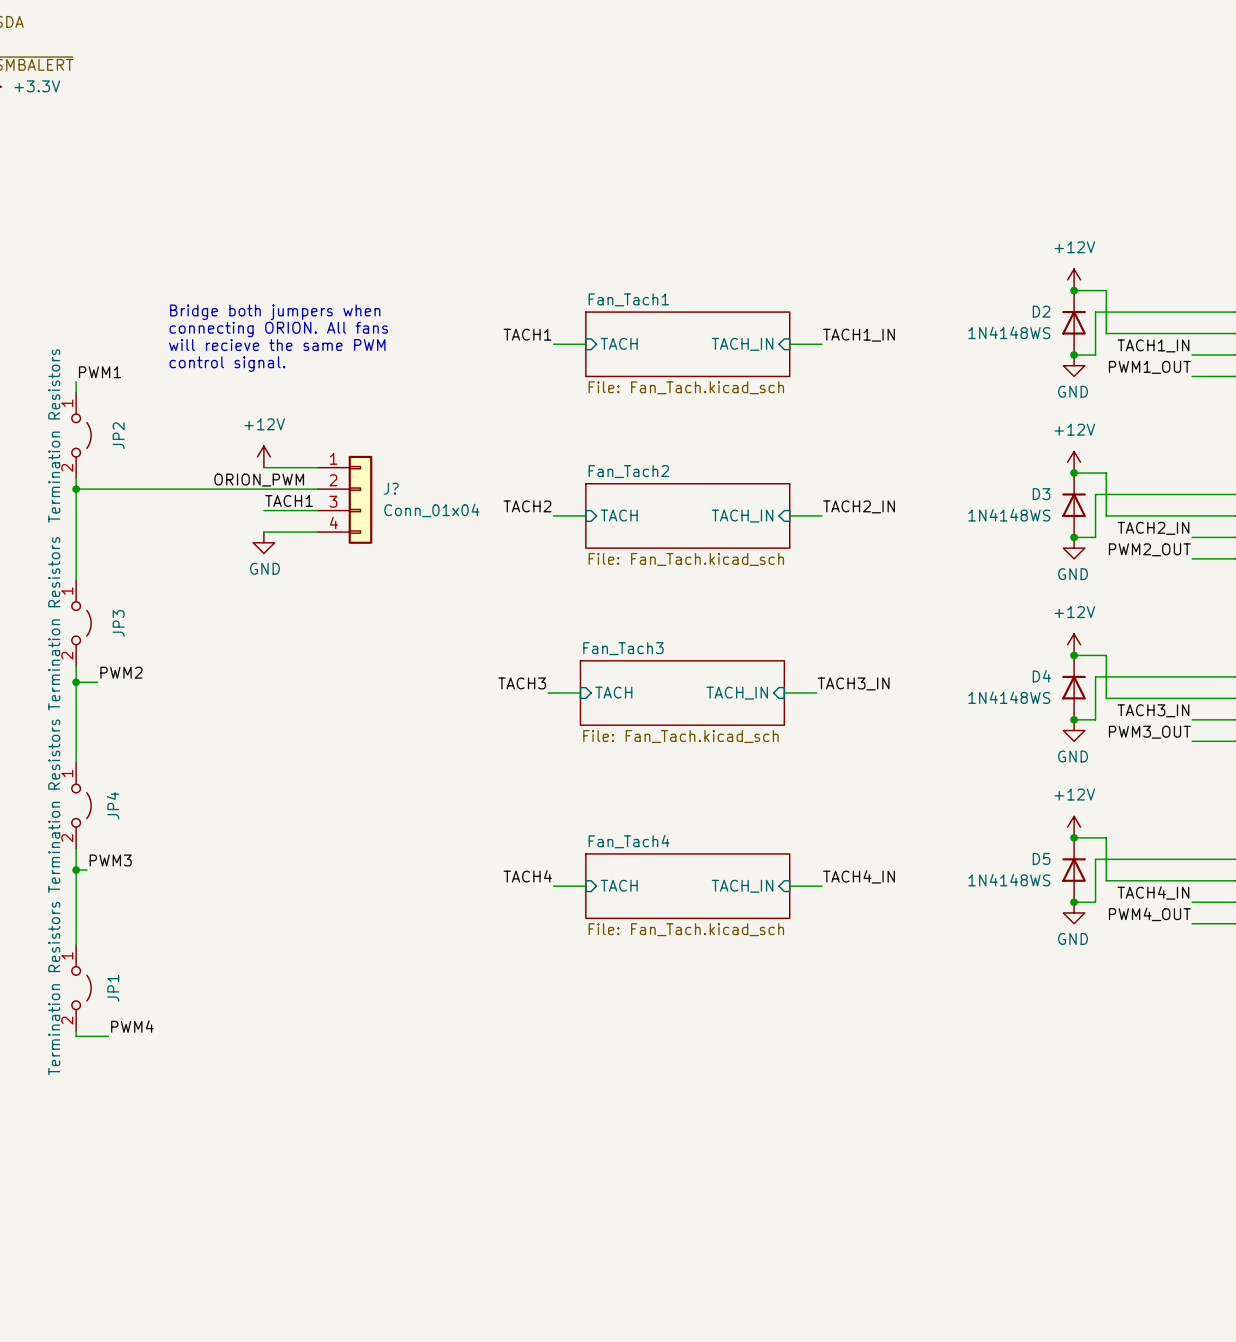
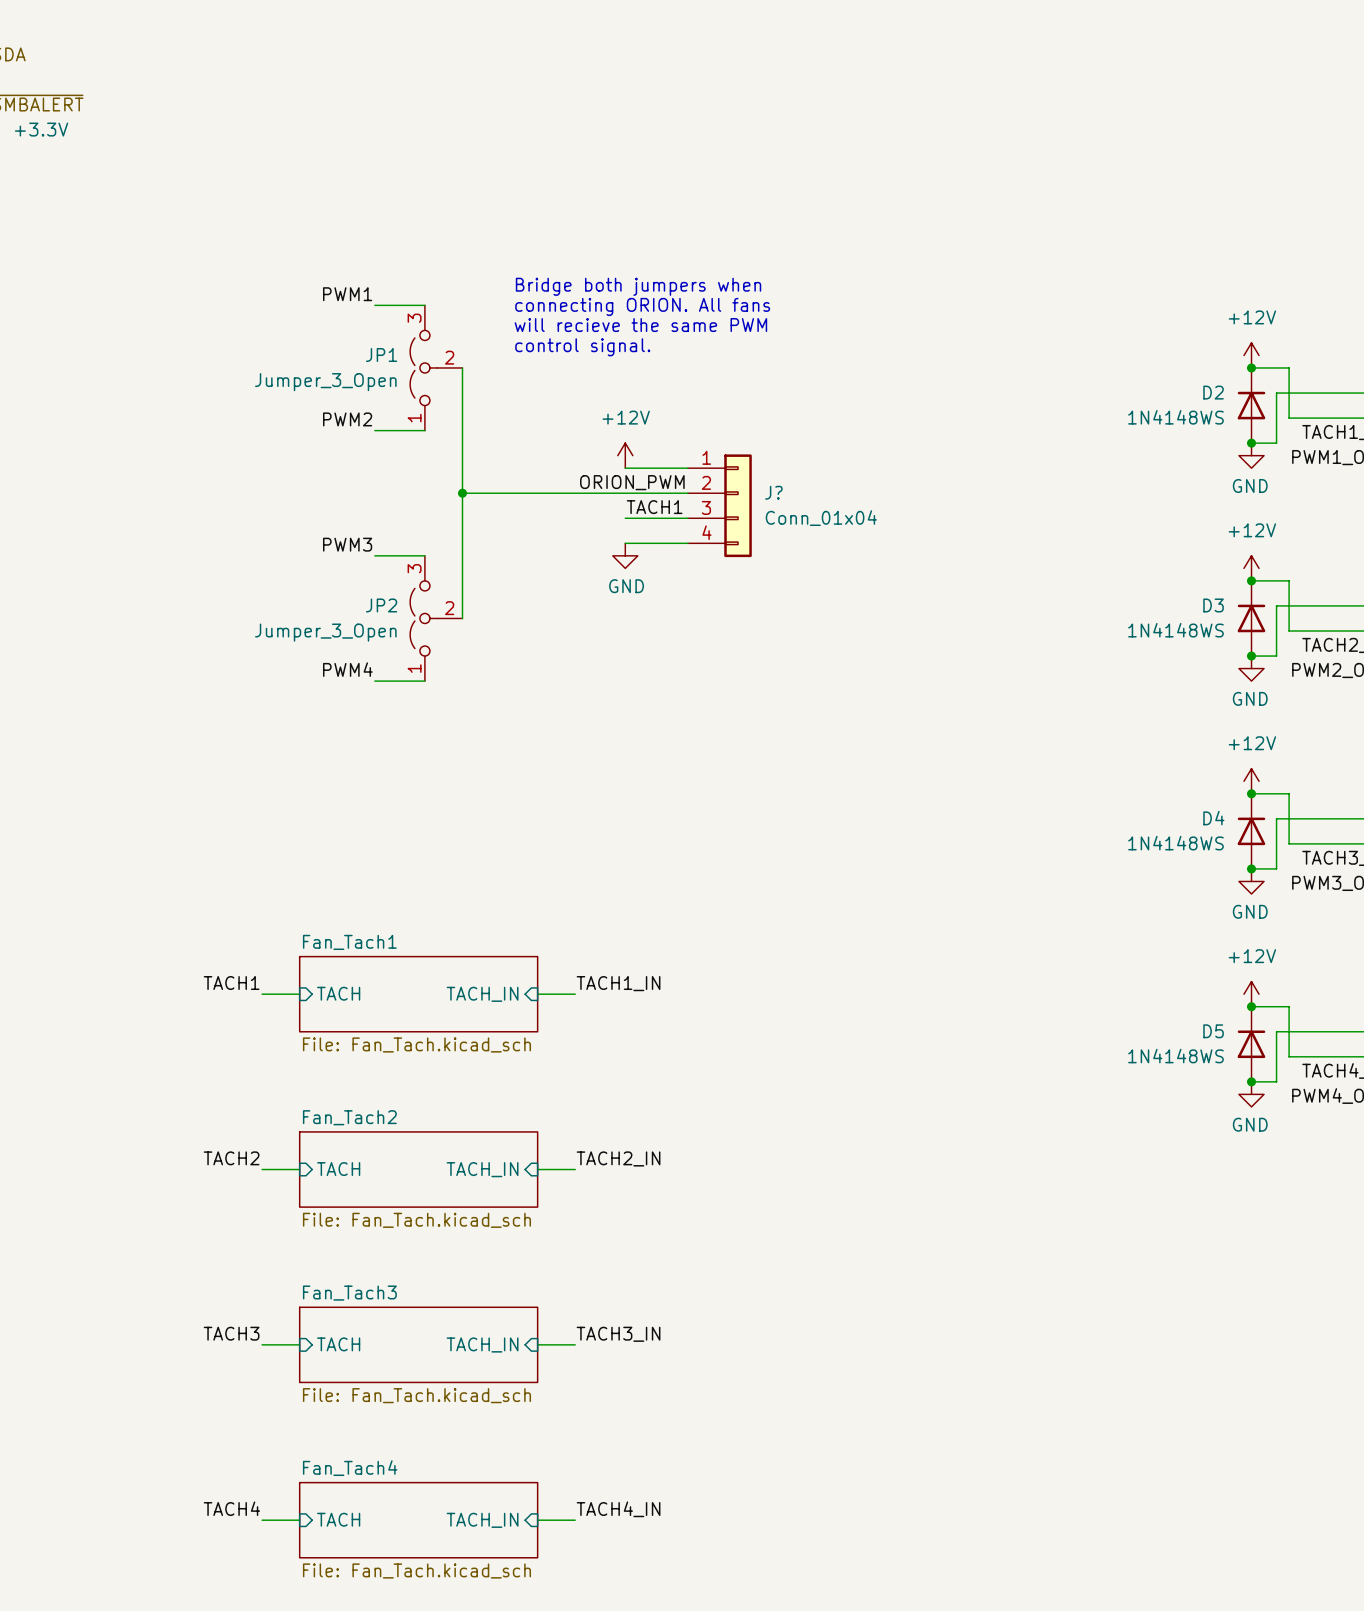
text: none -> Bridge both jumpers when (638, 286)
label: none -> PWM1 (347, 294)
wire: none -> (374, 305) (424, 305)
text: none -> connecting ORION. All fans (642, 306)
text: none -> will recieve the same PWM (640, 325)
text: none -> control signal. (582, 347)
wire: none -> (462, 367) (462, 618)
text: Bridge both jumpers when (275, 312) -> none
text: connecting ORION. All fans (278, 329) -> none
label: none -> PWM2 (347, 419)
label position: TACH1 (527, 334) -> TACH1 (654, 507)
label: TACH1_IN (859, 335) -> none
sheet pin: TACH (619, 343) -> none
wire: none -> (374, 430) (424, 430)
wire: (553, 344) (585, 344) -> none
sheet Fan_Tach1 position: (687, 344) -> (418, 994)
sheet pin: TACH_IN (742, 344) -> none
wire: (789, 344) (821, 344) -> none
text: will recieve the same PWM (277, 345) -> none
text: control signal. (227, 364) -> none
power symbol: none -> +12V (625, 455)
label: PWM1 (99, 372) -> none
wire: none -> (625, 468) (687, 468)
wire: (76, 381) (76, 392) -> none
label: none -> ORION_PWM (632, 482)
JP2 symbol: [71, 392, 92, 479] -> [410, 555, 463, 682]
wire: none -> (462, 493) (687, 493)
junction: none -> (462, 493)
J?: none -> Conn_01x04 (719, 505)
wire: none -> (625, 518) (687, 518)
JP2 value: Termination Resistors (54, 435) -> Jumper_3_Open (325, 632)
JP2 name position: JP2 (118, 435) -> JP2 (381, 605)
wire: none -> (625, 543) (687, 543)
label: none -> PWM3 (347, 544)
wire: none -> (374, 555) (424, 555)
power symbol: none -> GND (625, 555)
power symbol: +12V (263, 456) -> none
wire: (263, 467) (317, 467) -> none
wire: (76, 478) (76, 580) -> none
label: ORION_PWM (259, 480) -> none
wire: (76, 489) (317, 489) -> none
junction: (76, 489) -> none
J?: Conn_01x04 (344, 499) -> none
label: TACH1 (289, 501) -> none
label: TACH2 (527, 506) -> none
label: TACH2_IN (859, 506) -> none
wire: (263, 510) (317, 510) -> none
wire: (553, 515) (585, 515) -> none
sheet pin: TACH (619, 515) -> none
sheet Fan_Tach2 position: (687, 515) -> (418, 1169)
wire: (789, 515) (821, 515) -> none
sheet pin: TACH_IN (742, 516) -> none
wire: (263, 532) (317, 532) -> none
power symbol: GND (263, 542) -> none
label: none -> PWM4 (347, 669)
wire: none -> (374, 681) (424, 681)
JP3: Termination Resistors (81, 623) -> none
wire: (76, 666) (76, 762) -> none
label: PWM2 (121, 672) -> none
wire: (76, 682) (97, 682) -> none
junction: (76, 682) -> none
label: TACH3 (522, 683) -> none
label: TACH3_IN (853, 683) -> none
sheet pin: TACH (613, 692) -> none
wire: (548, 693) (580, 693) -> none
sheet Fan_Tach3 position: (682, 693) -> (418, 1344)
sheet pin: TACH_IN (737, 693) -> none
wire: (784, 693) (816, 693) -> none
JP4: Termination Resistors (81, 805) -> none
label: none -> TACH1 (231, 983)
label: none -> TACH1_IN (618, 983)
sheet pin: none -> TACH (338, 993)
wire: none -> (262, 994) (299, 994)
sheet pin: none -> TACH_IN (482, 994)
wire: (76, 848) (76, 945) -> none
label: PWM3 (110, 860) -> none
wire: (76, 870) (86, 870) -> none
junction: (76, 870) -> none
label: TACH4 (527, 876) -> none
label: TACH4_IN (859, 876) -> none
sheet pin: TACH (619, 885) -> none
wire: (553, 886) (585, 886) -> (537, 994) (575, 994)
sheet Fan_Tach4 position: (687, 886) -> (418, 1520)
sheet pin: TACH_IN (742, 886) -> none
wire: (789, 886) (821, 886) -> none
JP1 symbol: [71, 945, 92, 1032] -> [410, 305, 463, 431]
label: none -> TACH2 (231, 1158)
label: none -> TACH2_IN (618, 1158)
sheet pin: none -> TACH (338, 1169)
wire: none -> (262, 1169) (299, 1169)
sheet pin: none -> TACH_IN (482, 1169)
wire: none -> (537, 1169) (575, 1169)
JP1 value: Termination Resistors (54, 988) -> Jumper_3_Open (325, 382)
JP1 name position: JP1 (113, 988) -> JP1 (381, 354)
label: PWM4 (132, 1026) -> none
wire: (76, 1031) (76, 1036) (108, 1036) -> none
label: none -> TACH3 (231, 1333)
label: none -> TACH3_IN (618, 1334)
wire: none -> (262, 1344) (299, 1344)
sheet pin: none -> TACH (338, 1344)
sheet pin: none -> TACH_IN (482, 1344)
wire: none -> (537, 1344) (575, 1344)
label: none -> TACH4 (231, 1508)
label: none -> TACH4_IN (618, 1509)
wire: none -> (262, 1520) (299, 1520)
sheet pin: none -> TACH (338, 1519)
sheet pin: none -> TACH_IN (482, 1520)
wire: none -> (537, 1520) (575, 1520)

